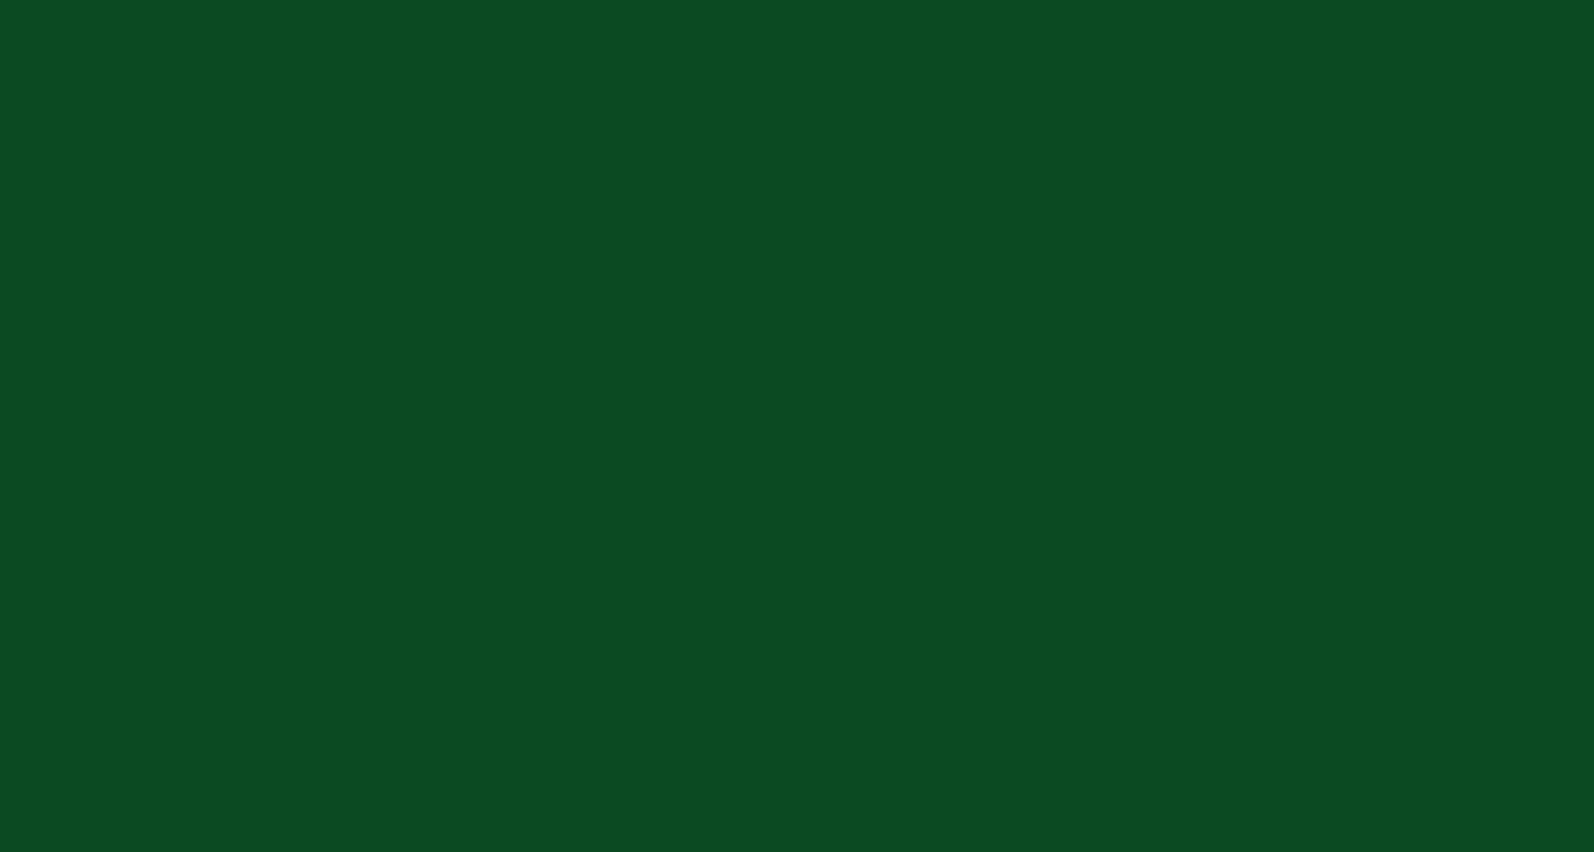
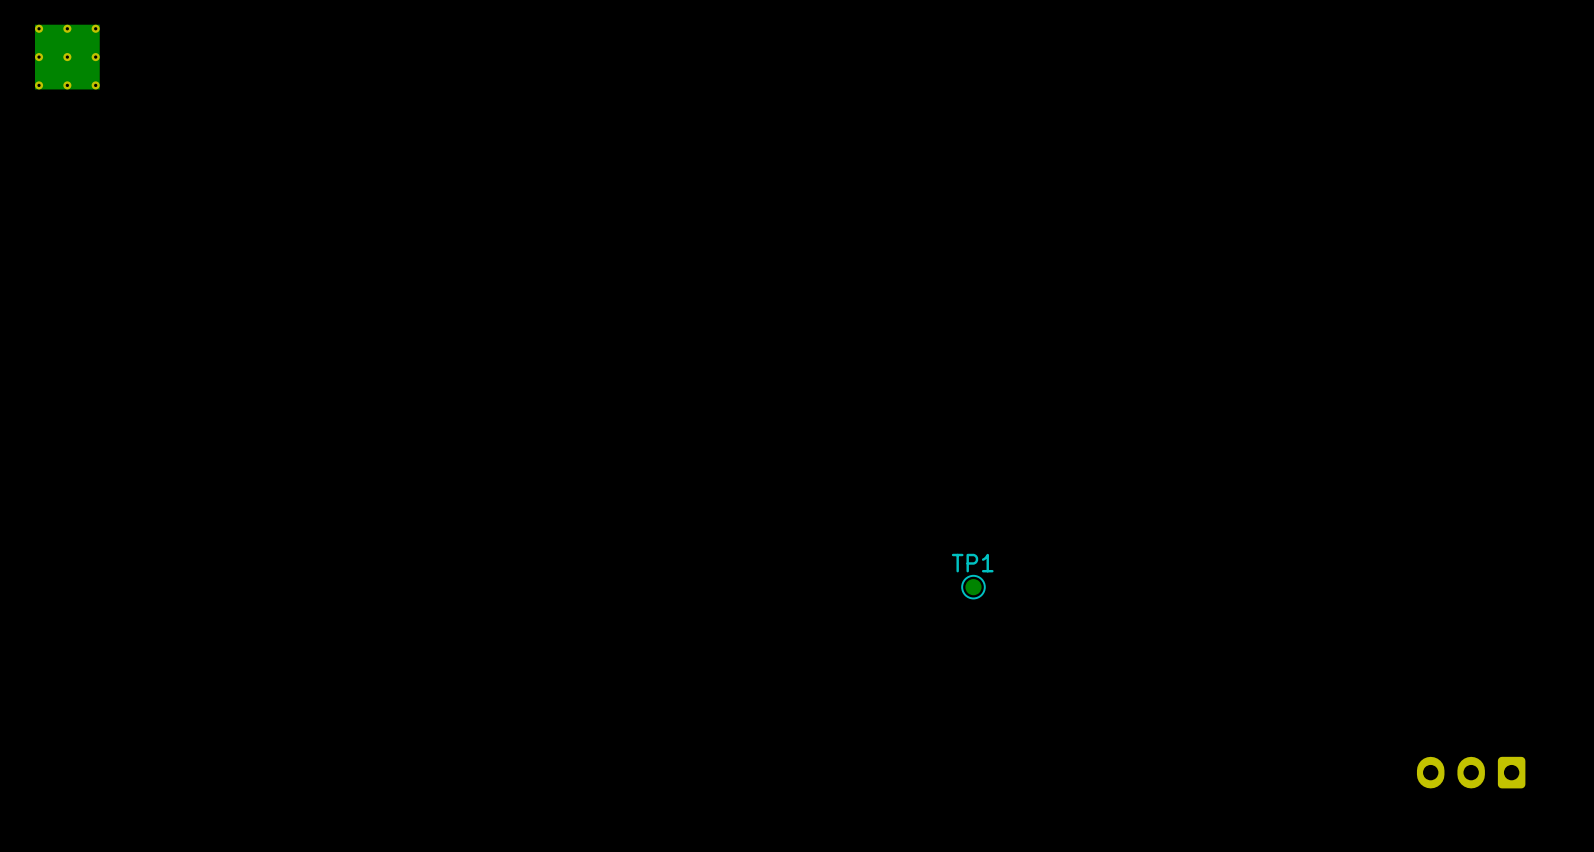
part: none -> (67, 57)
TP1: none -> (973, 587)
part: none -> (1471, 772)

